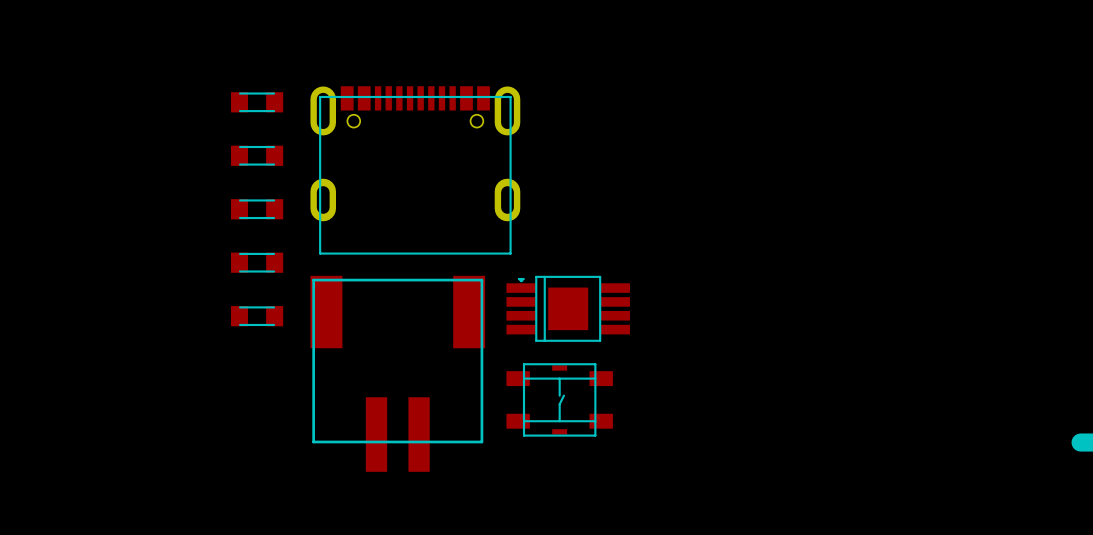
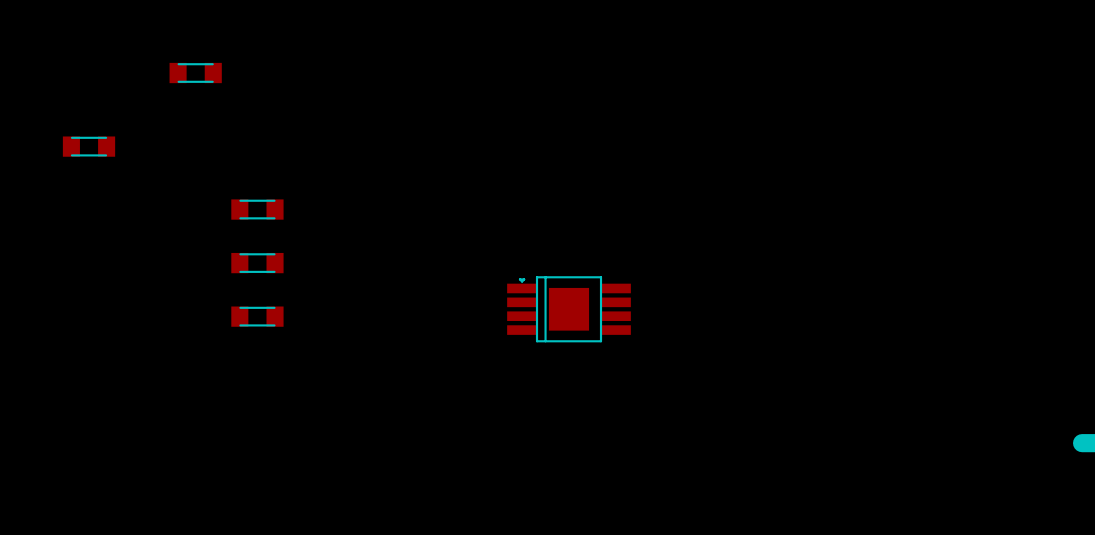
part: none -> (195, 73)
part: (257, 102) -> none
part: none -> (89, 146)
part: (257, 155) -> none
part: (415, 170) -> none
part: (397, 373) -> none
part: (559, 399) -> none

